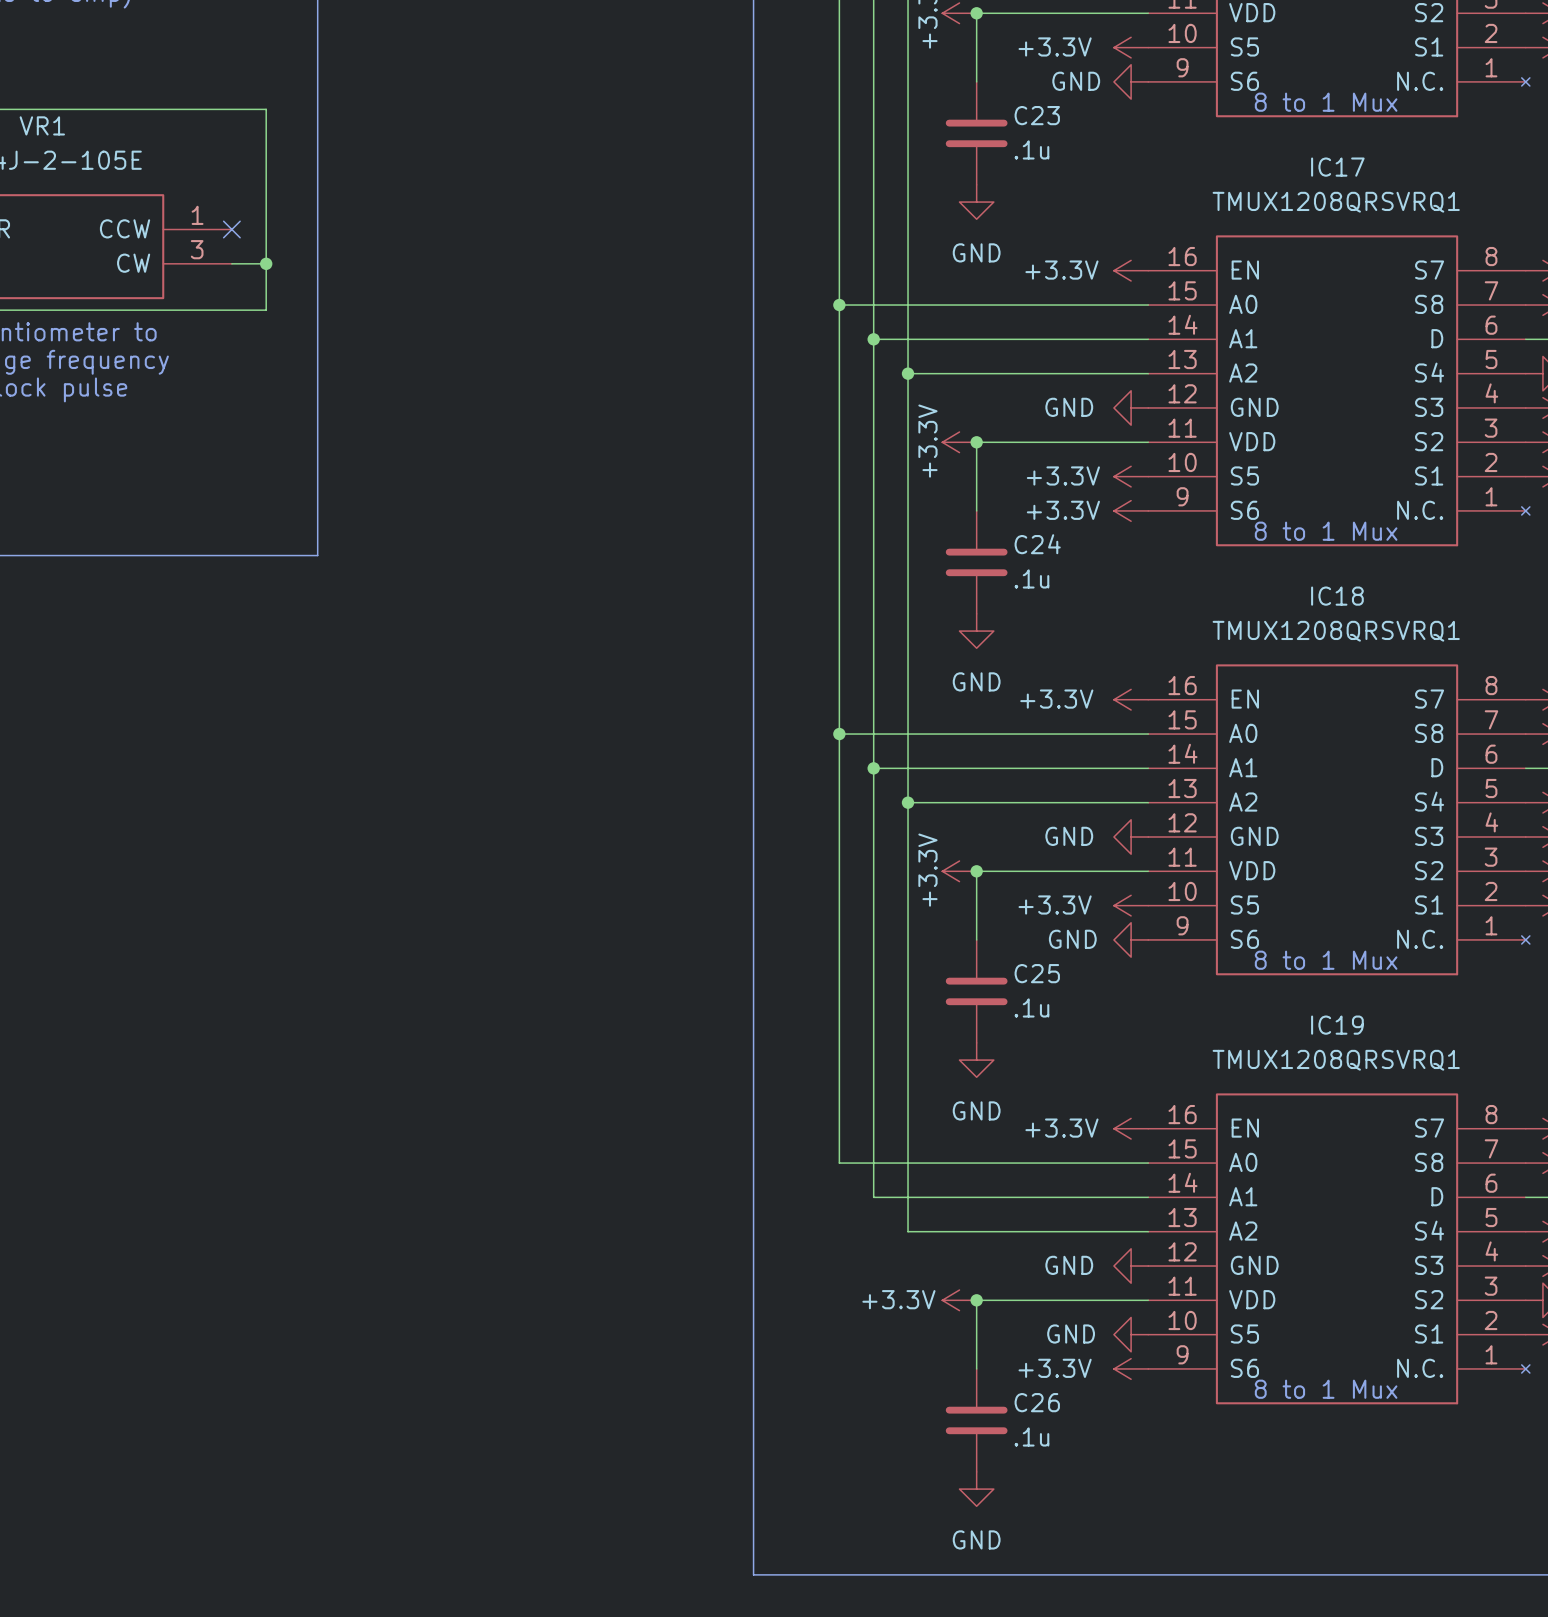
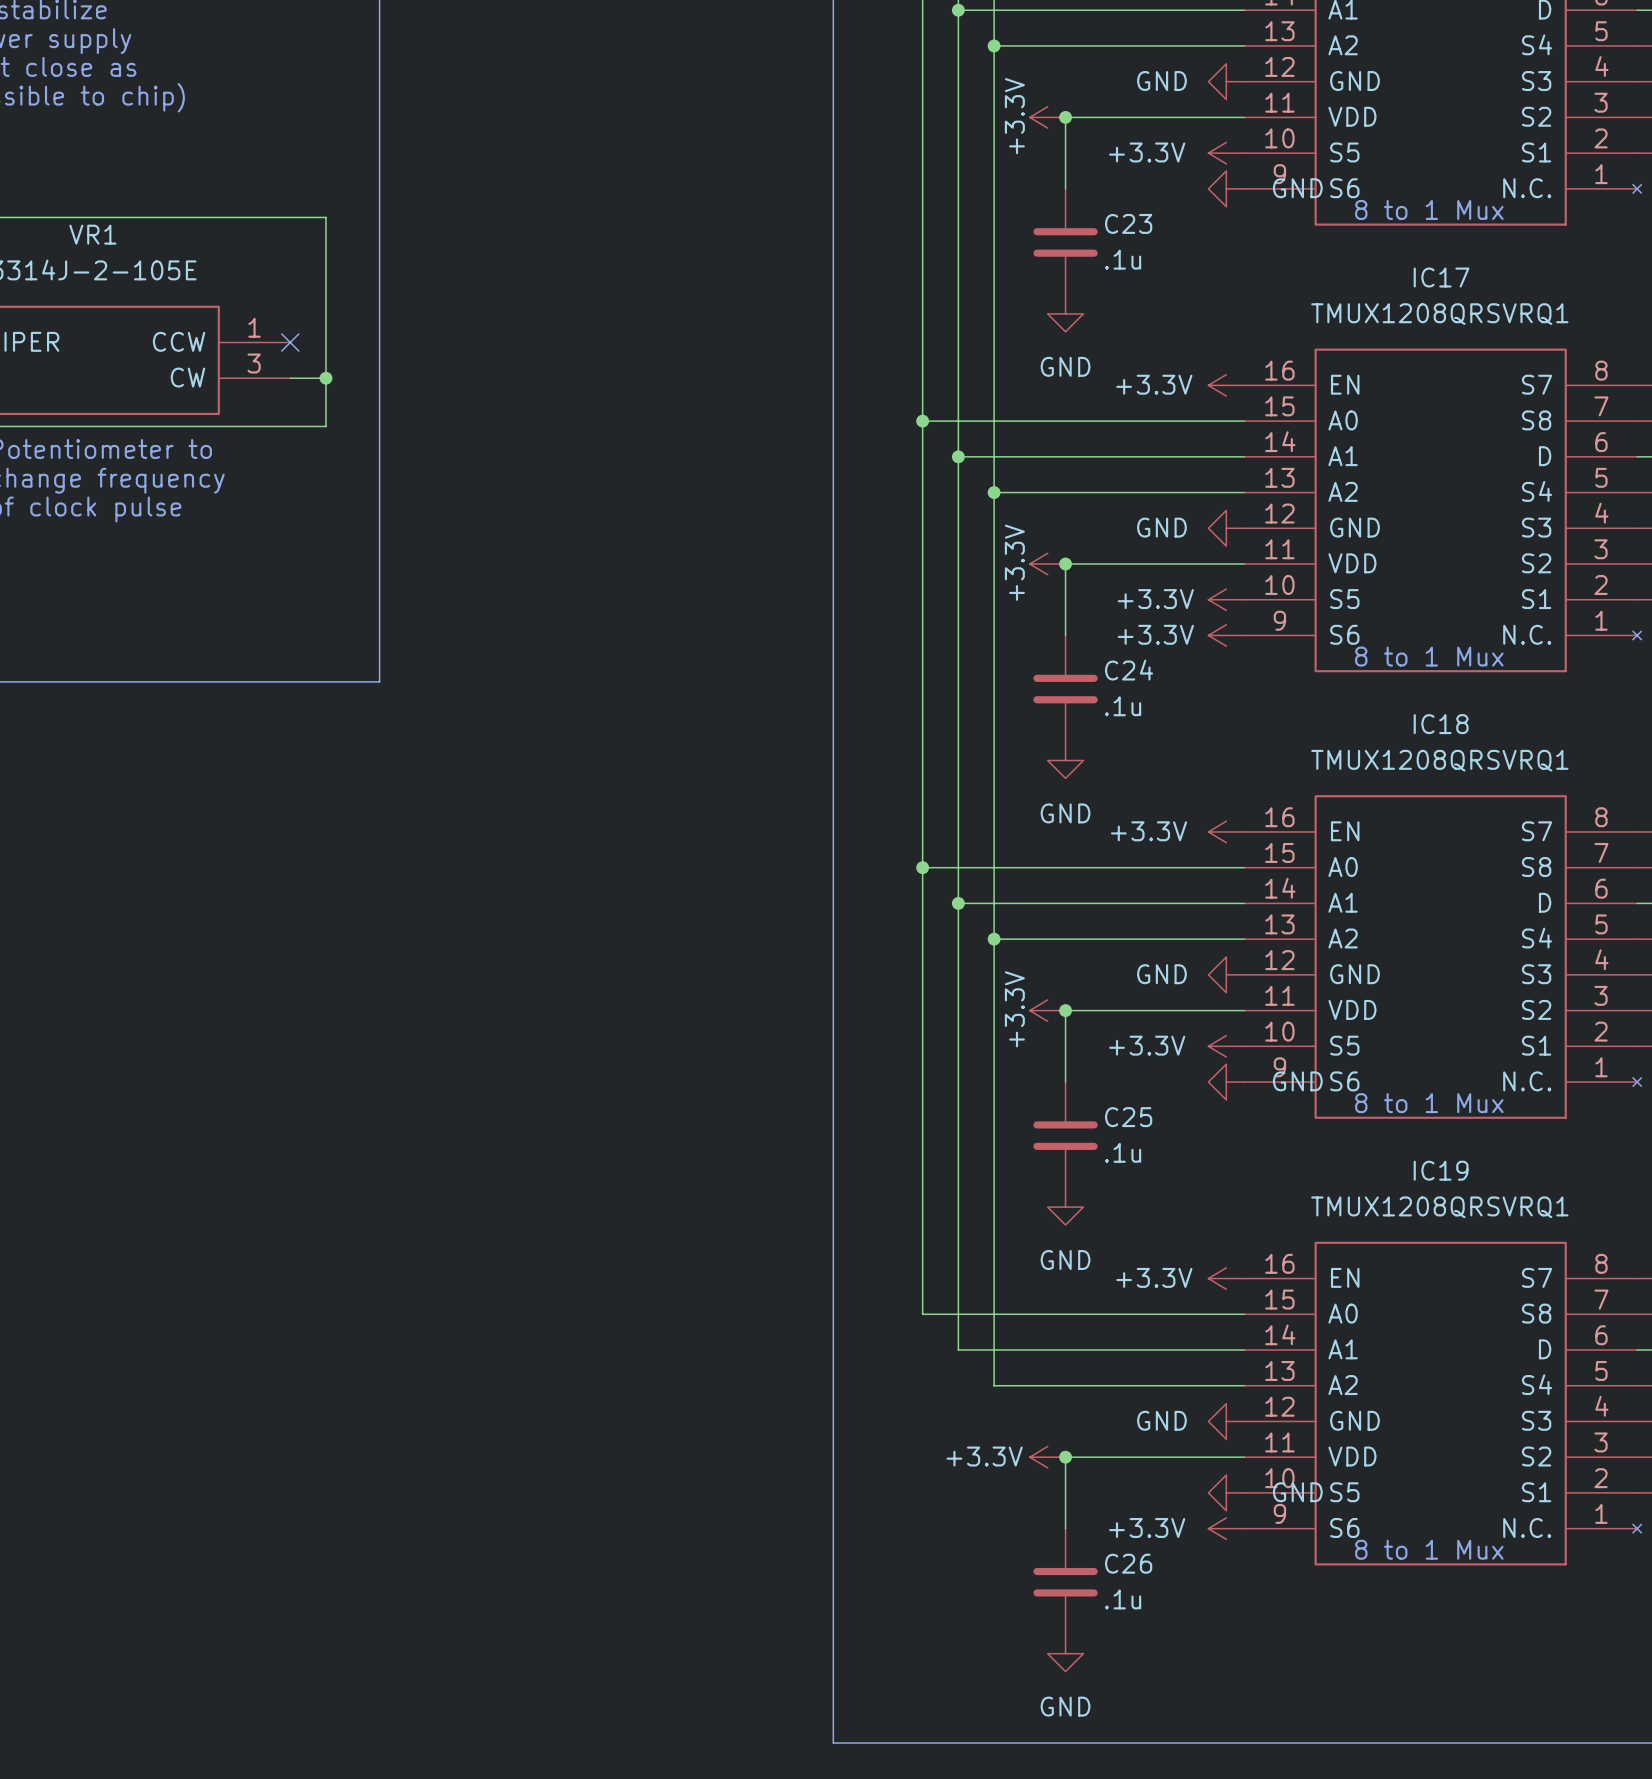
power symbol text position: GND (1076, 81) -> GND (1297, 188)
power symbol text position: GND (1072, 939) -> GND (1297, 1081)
power symbol text position: GND (1071, 1334) -> GND (1297, 1492)

